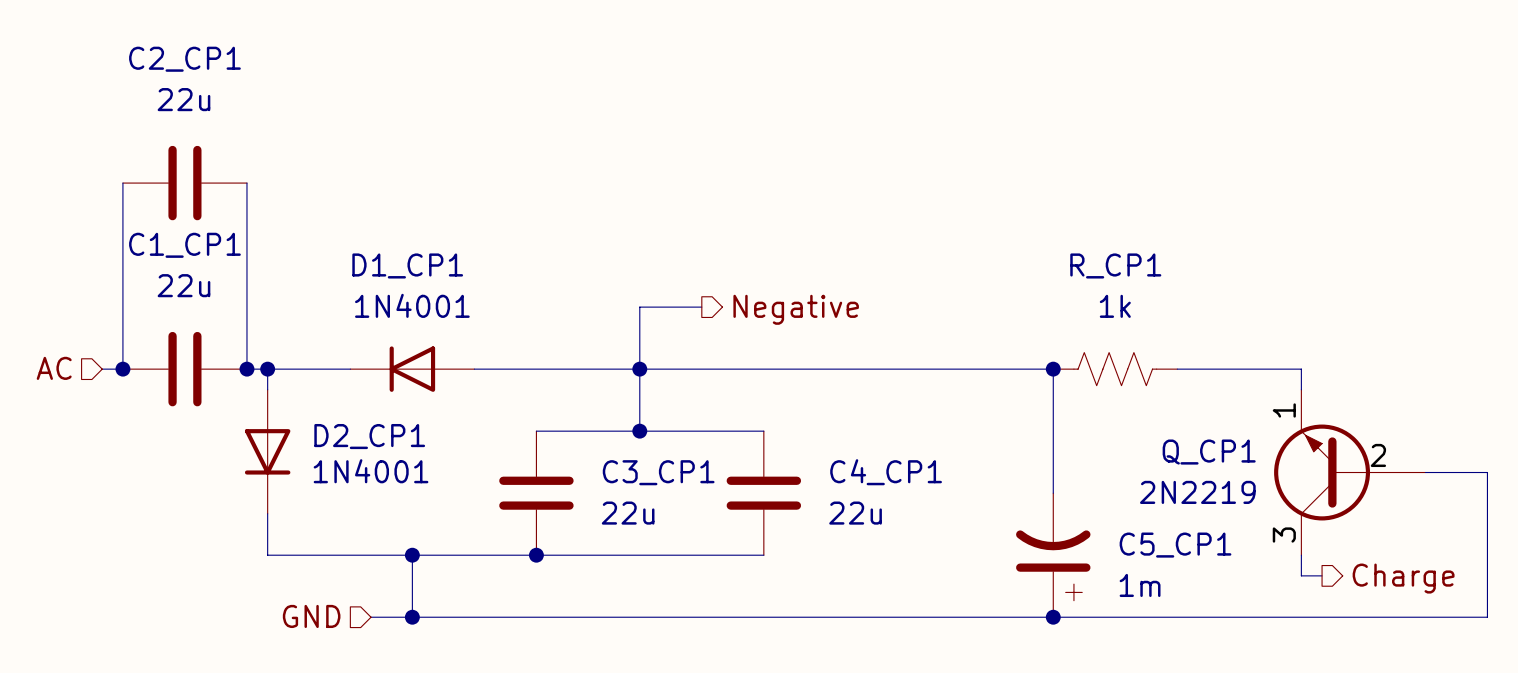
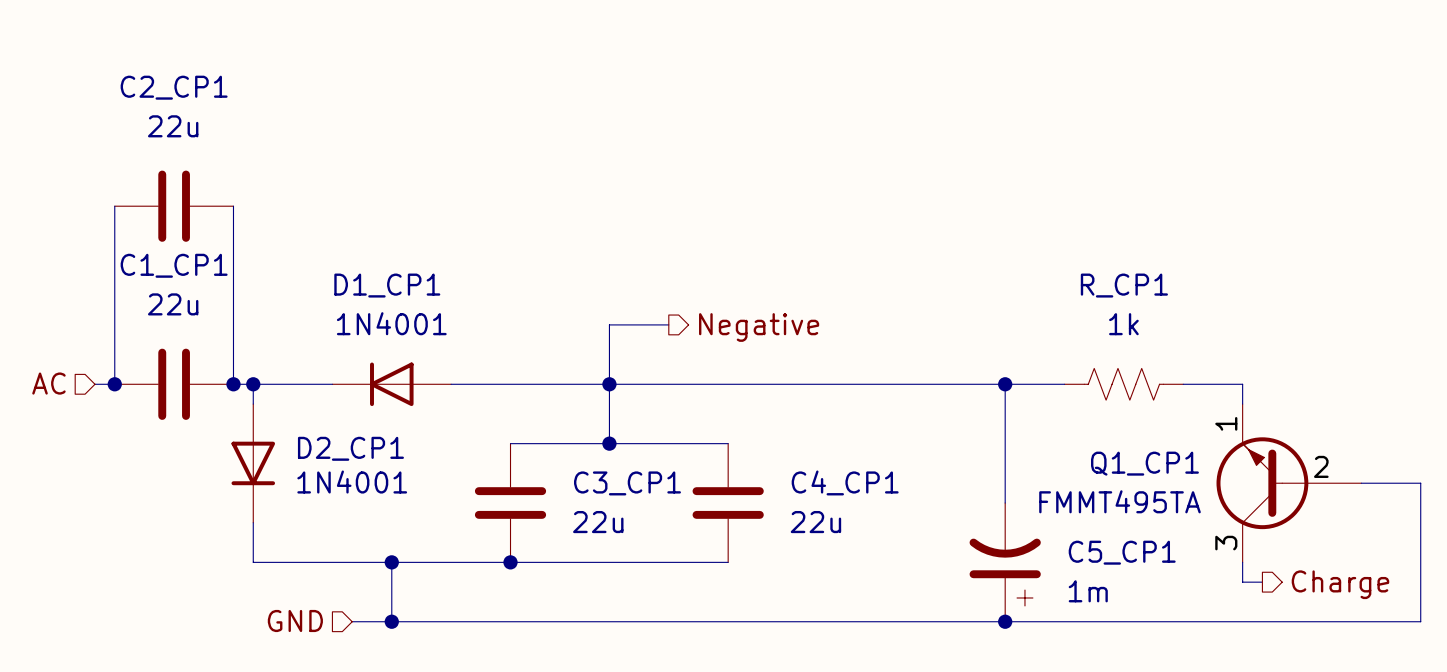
R_CP1 position: (1115, 369) -> (1123, 384)
wire: (1177, 369) (1239, 369) -> (1005, 384) (1064, 384)
Q_CP1: 2N2219 (1349, 472) -> none
Q1_CP1: none -> FMMT495TA (1288, 483)

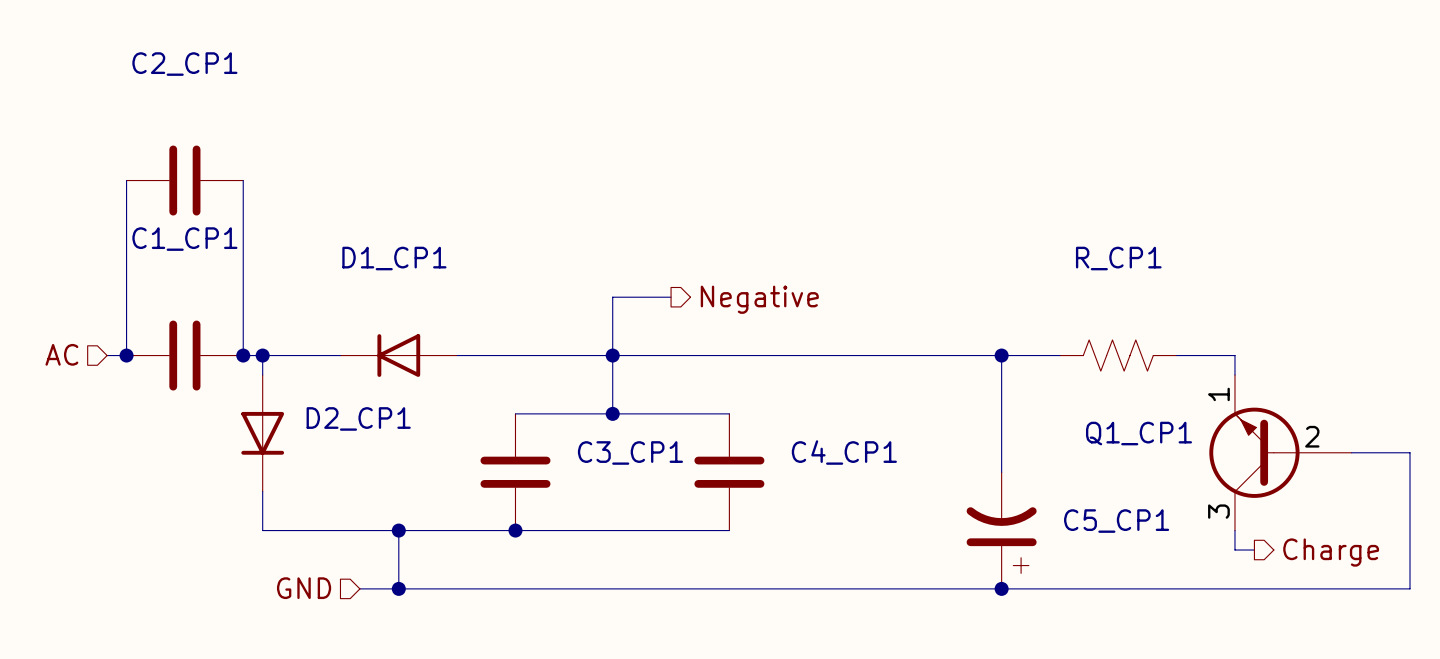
C2_CP1 value: 22u (173, 126) -> none
C1_CP1 value: 22u (173, 304) -> none
D1_CP1 value: 1N4001 (391, 323) -> none
R_CP1 value: 1k (1123, 324) -> none
D2_CP1 value: 1N4001 (352, 482) -> none
Q1_CP1 value: FMMT495TA (1119, 501) -> none
C3_CP1 value: 22u (598, 522) -> none
C4_CP1 value: 22u (815, 522) -> none
C5_CP1 value: 1m (1088, 591) -> none

